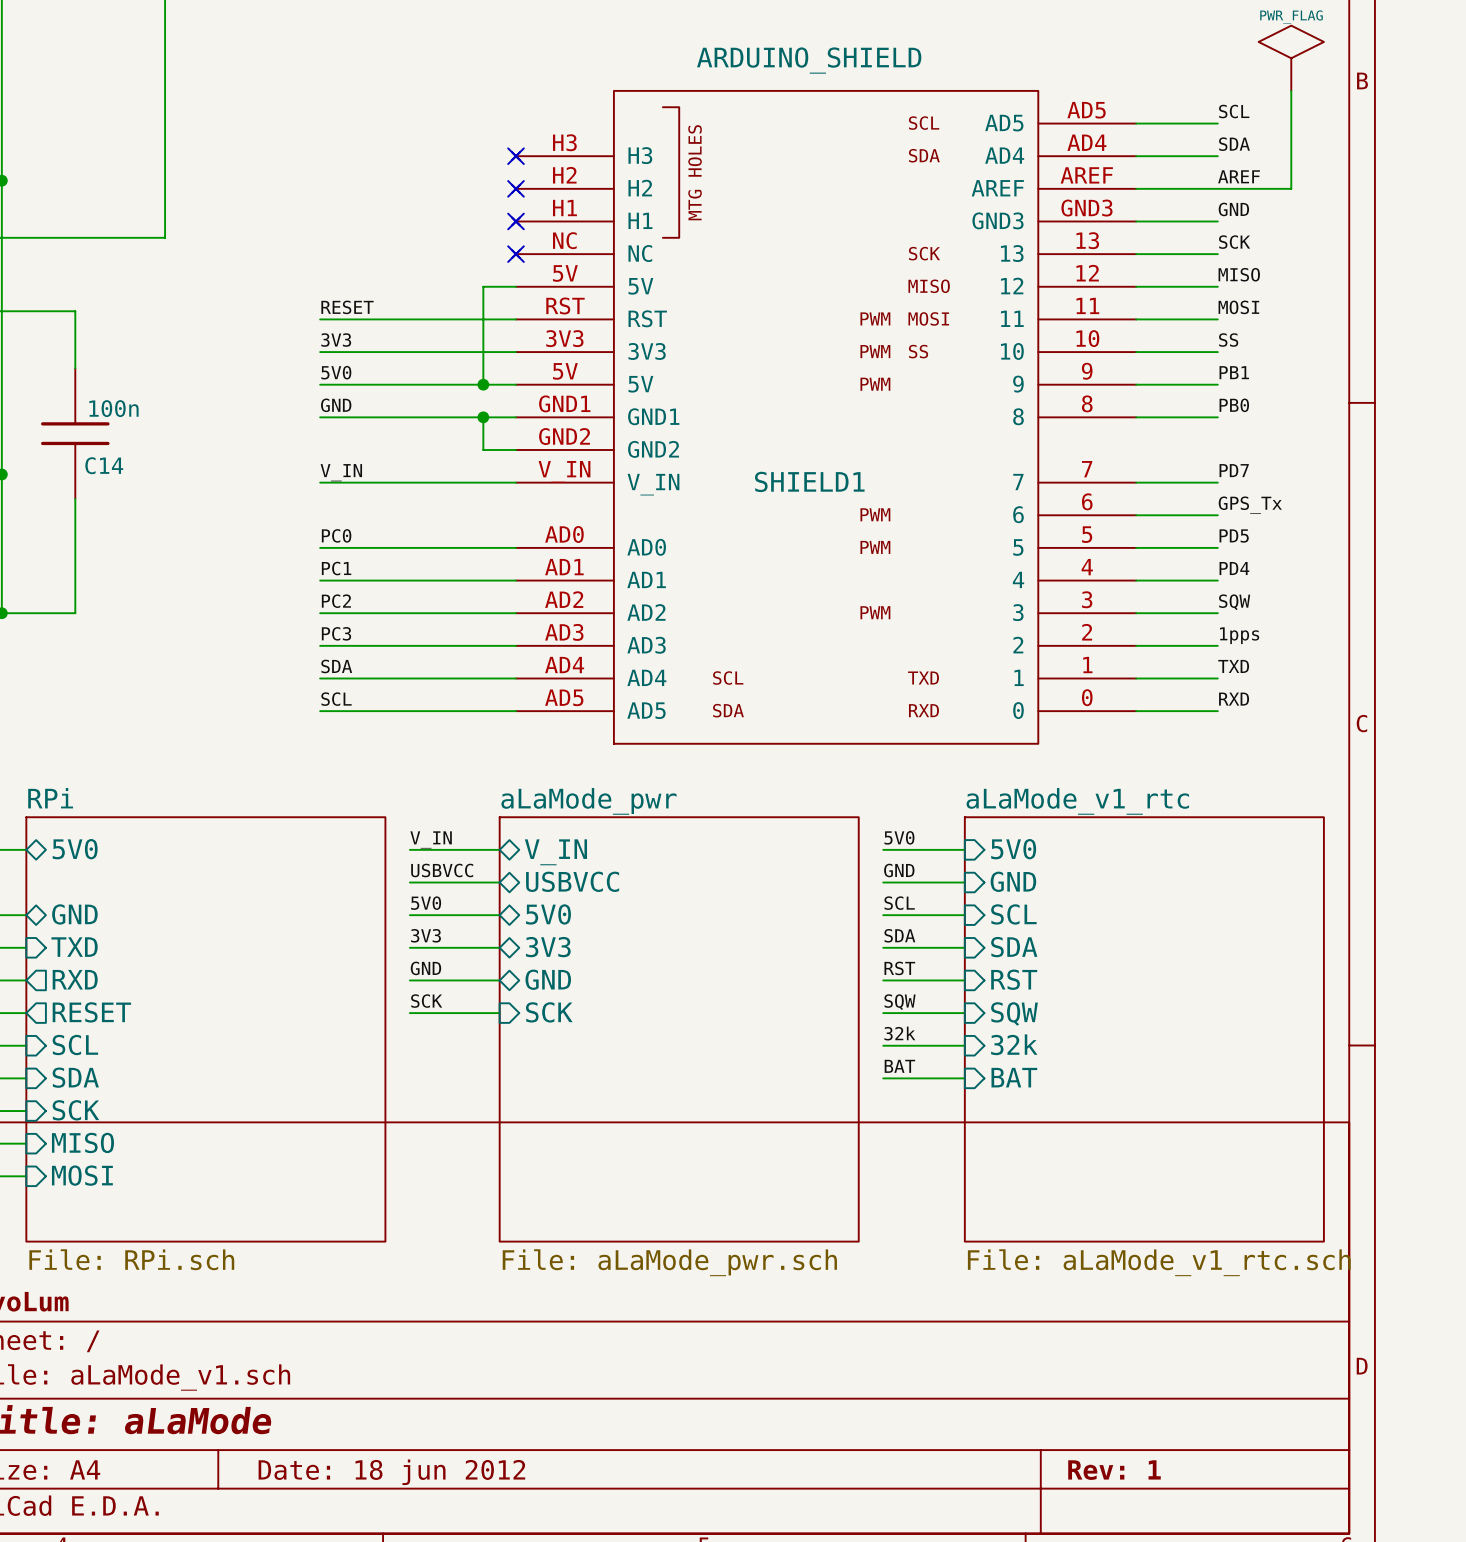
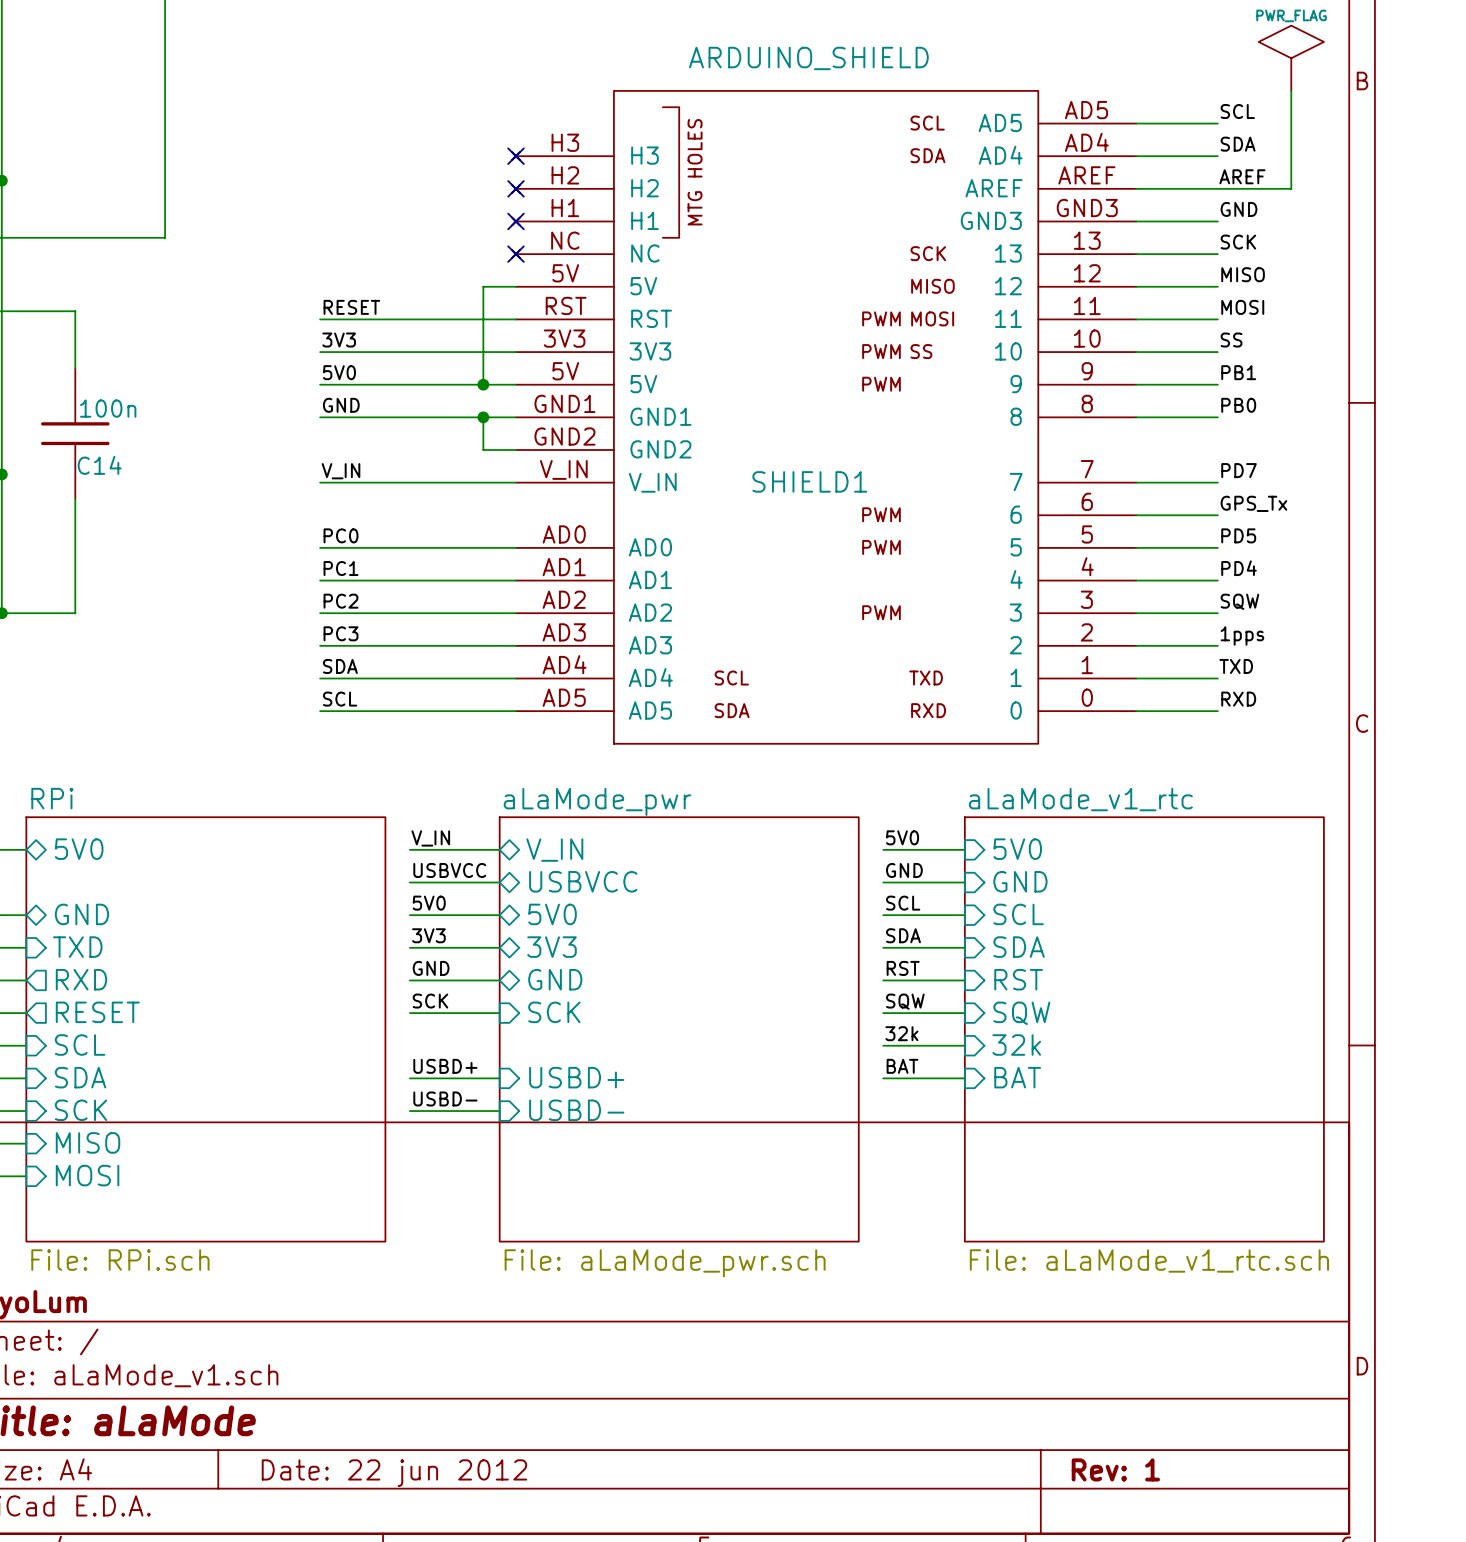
label: none -> USBD+ (445, 1066)
sheet pin: none -> USBD+ (576, 1077)
wire: none -> (409, 1078) (499, 1078)
label: none -> USBD- (445, 1098)
sheet pin: none -> USBD- (576, 1110)
wire: none -> (409, 1111) (499, 1111)
title block: Date: 18 jun 2012 (391, 1472) -> Date: 22 jun 2012 (394, 1473)

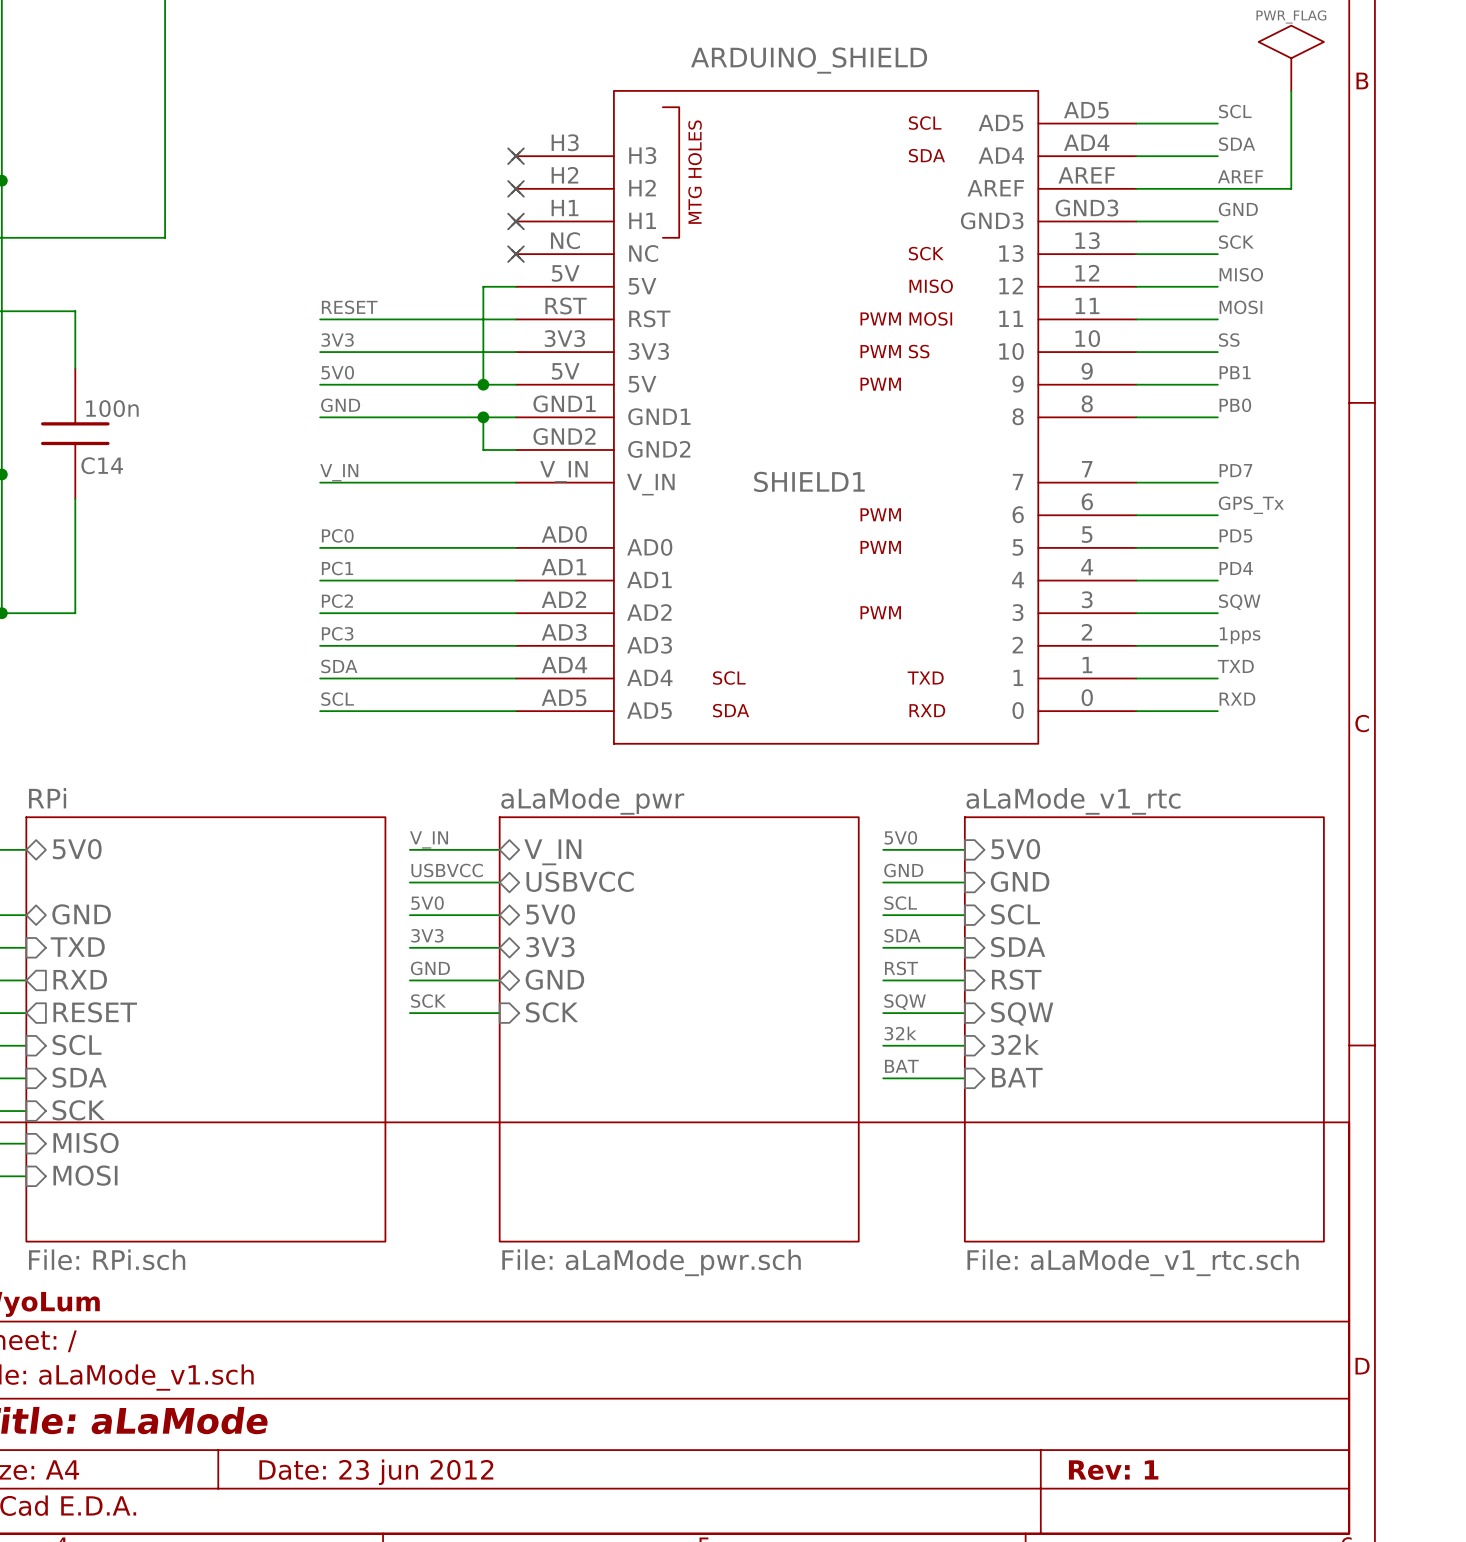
label: USBD+ (445, 1066) -> none
sheet pin: USBD+ (576, 1077) -> none
wire: (409, 1078) (499, 1078) -> none
label: USBD- (445, 1098) -> none
sheet pin: USBD- (576, 1110) -> none
wire: (409, 1111) (499, 1111) -> none
title block: Date: 22 jun 2012 (394, 1473) -> Date: 23 jun 2012 (376, 1472)

